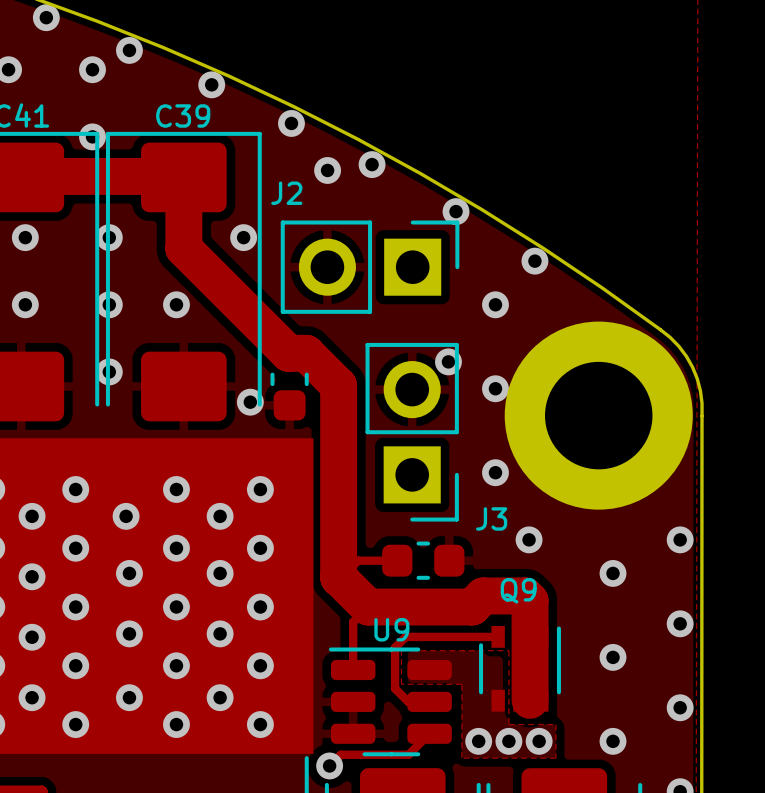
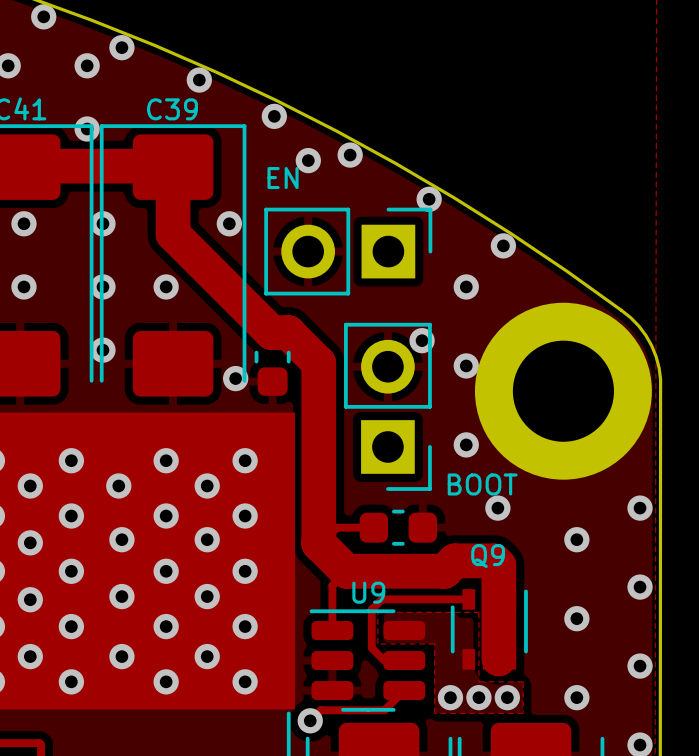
text: none -> EN (283, 178)
J2 name: J2 (286, 193) -> none
text: none -> BOOT (482, 484)
J3 name: J3 (491, 518) -> none

